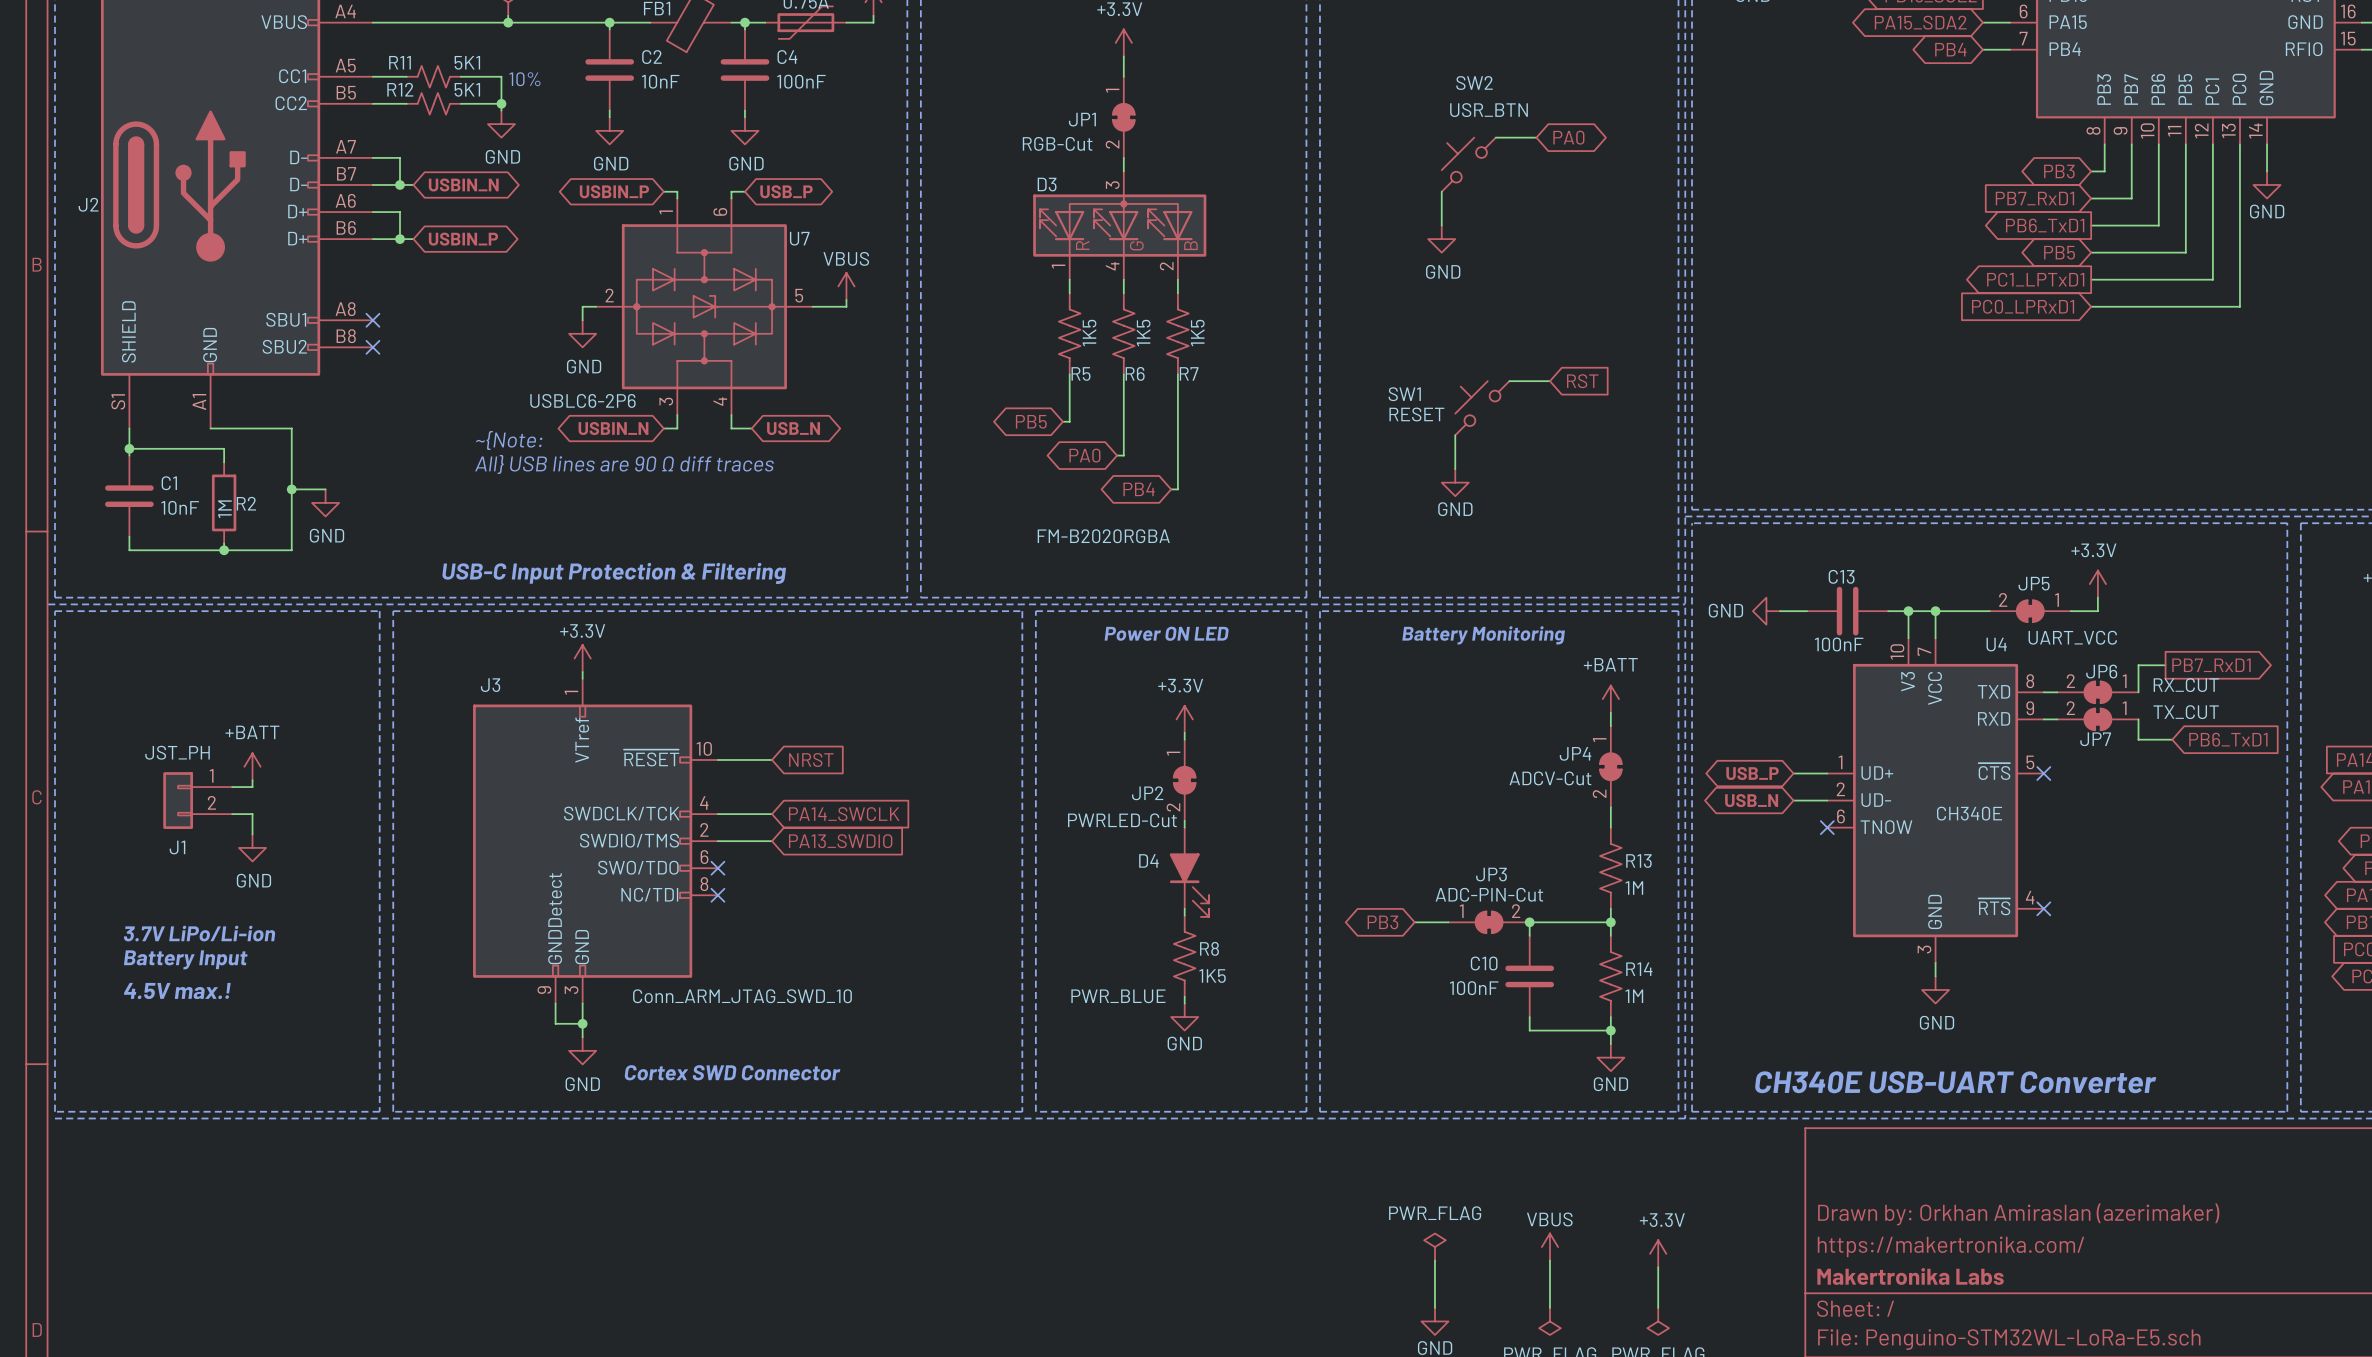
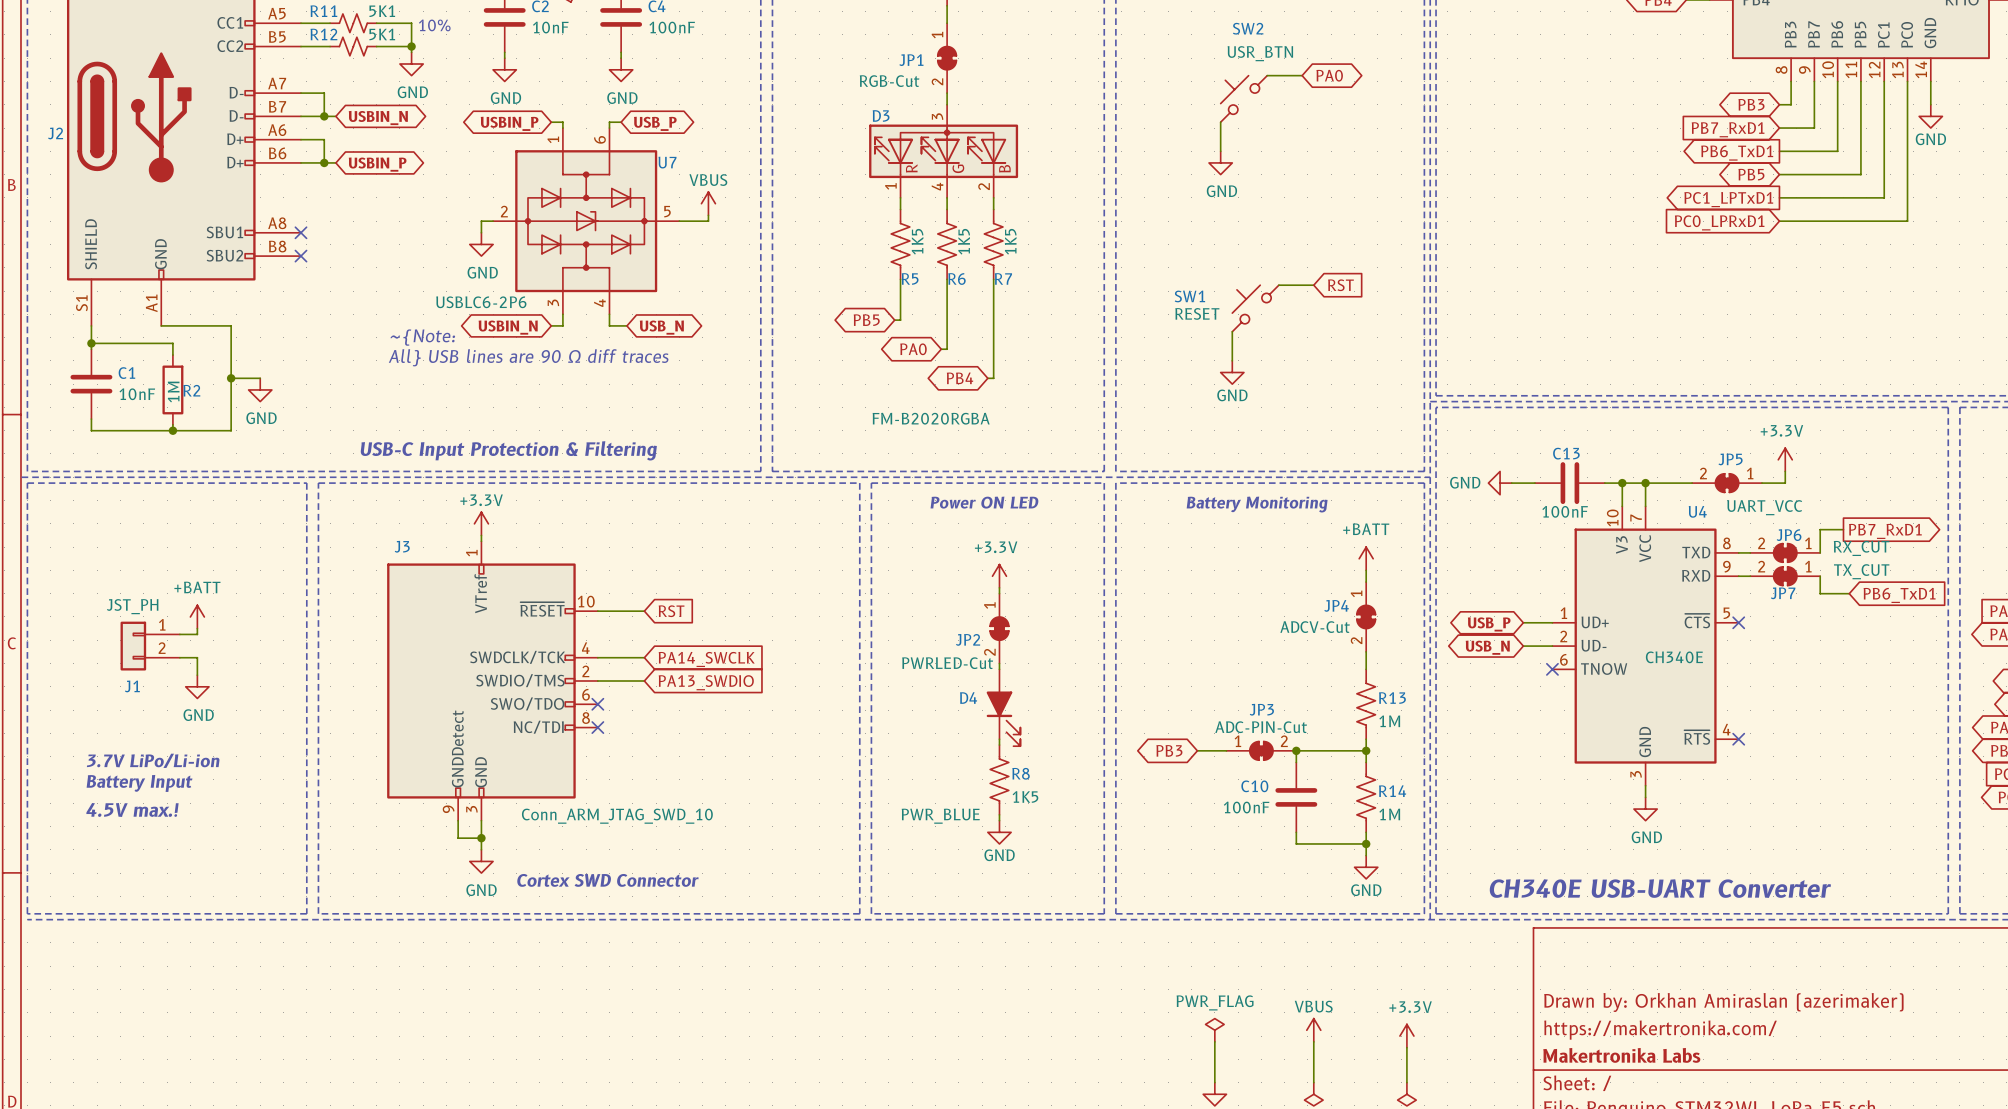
global label: NRST (811, 759) -> RST (671, 611)

